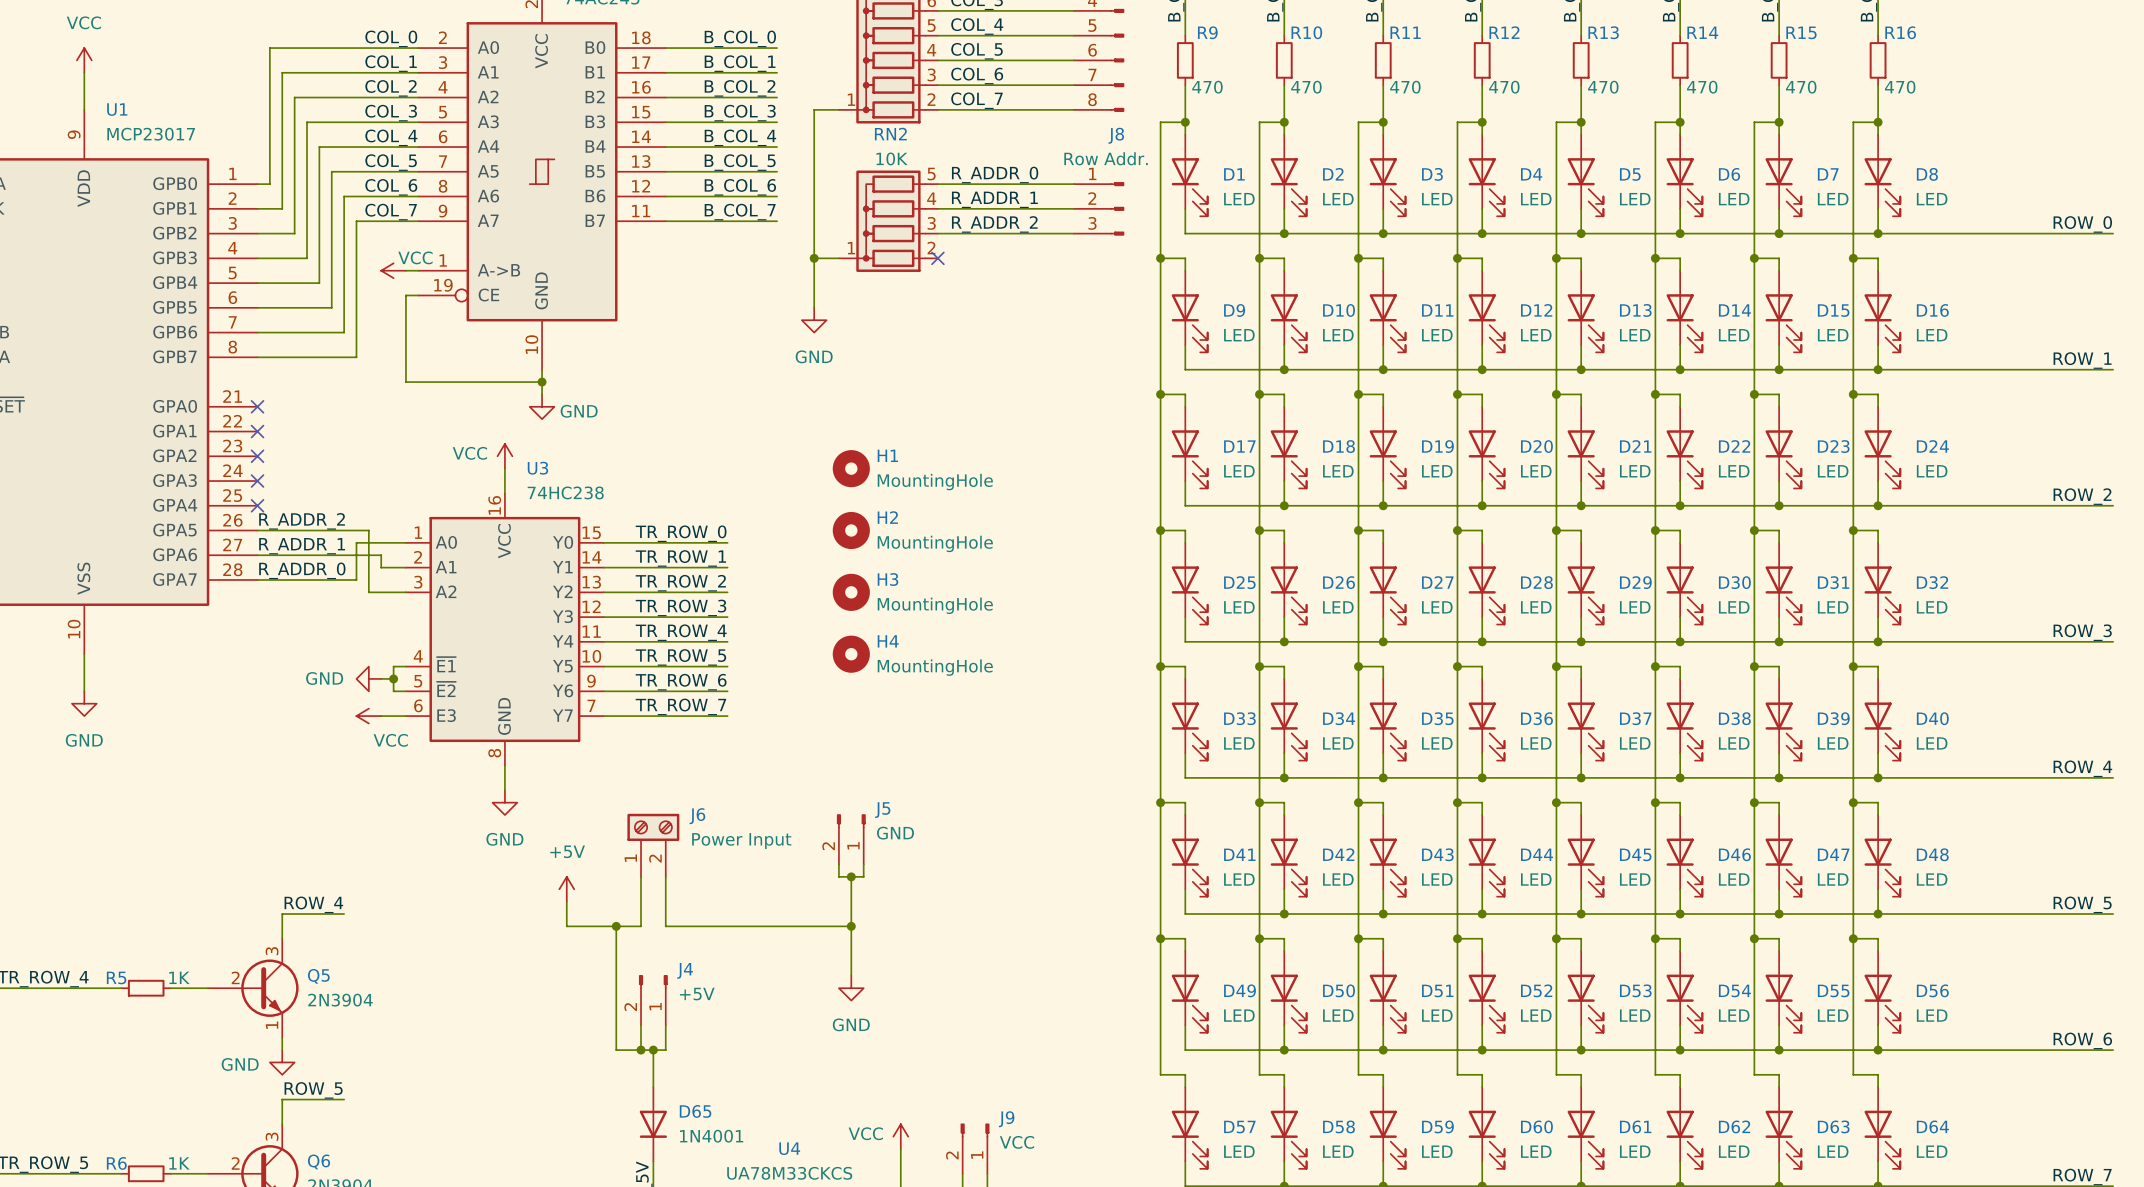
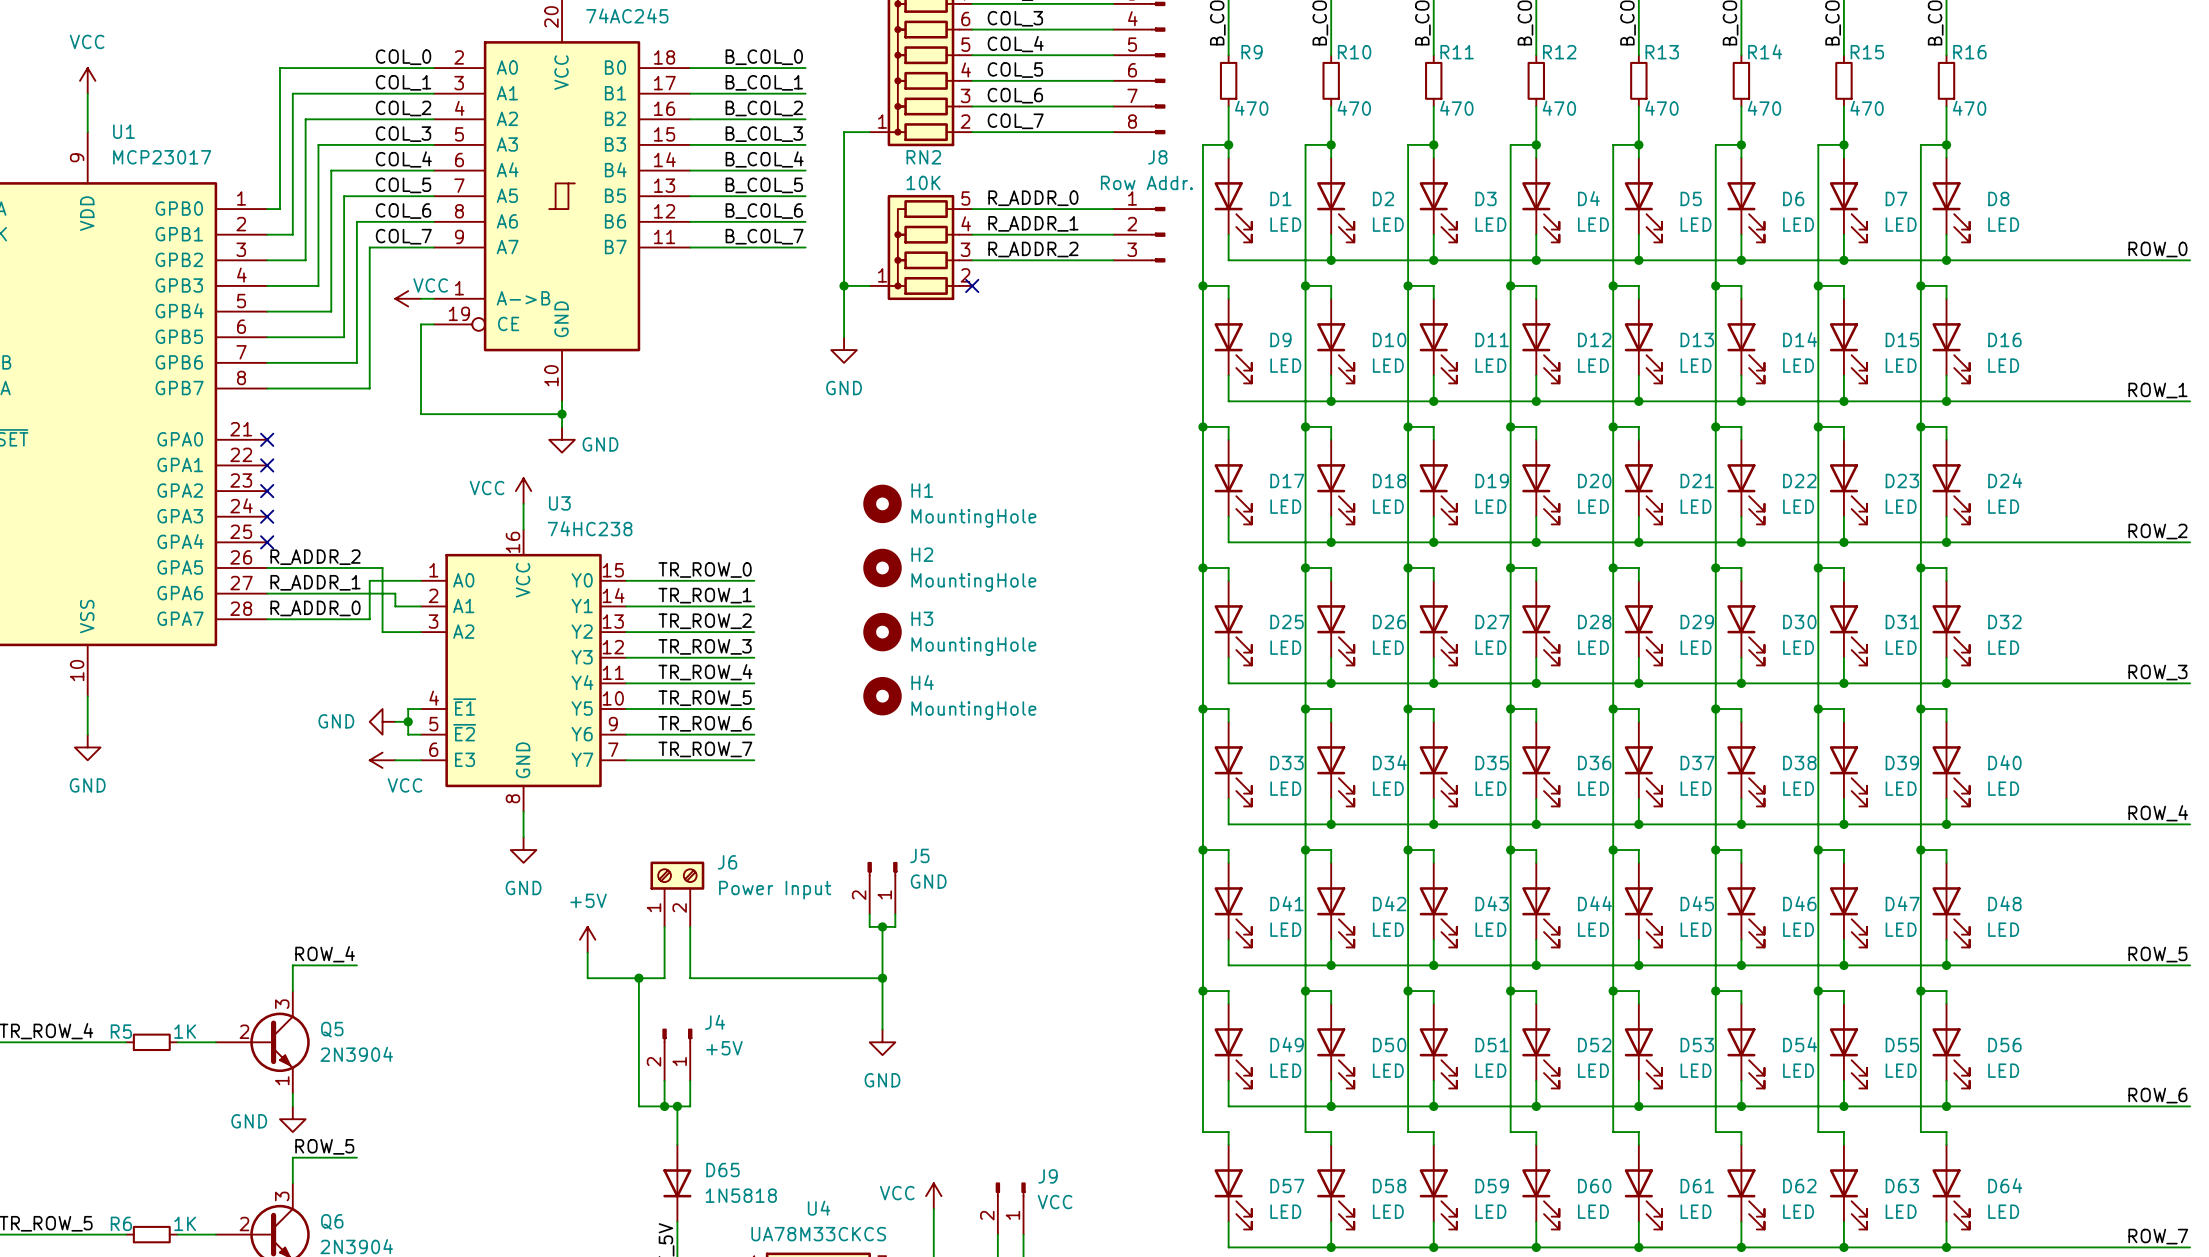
D65 value: 1N4001 (711, 1136) -> 1N5818 (741, 1195)

